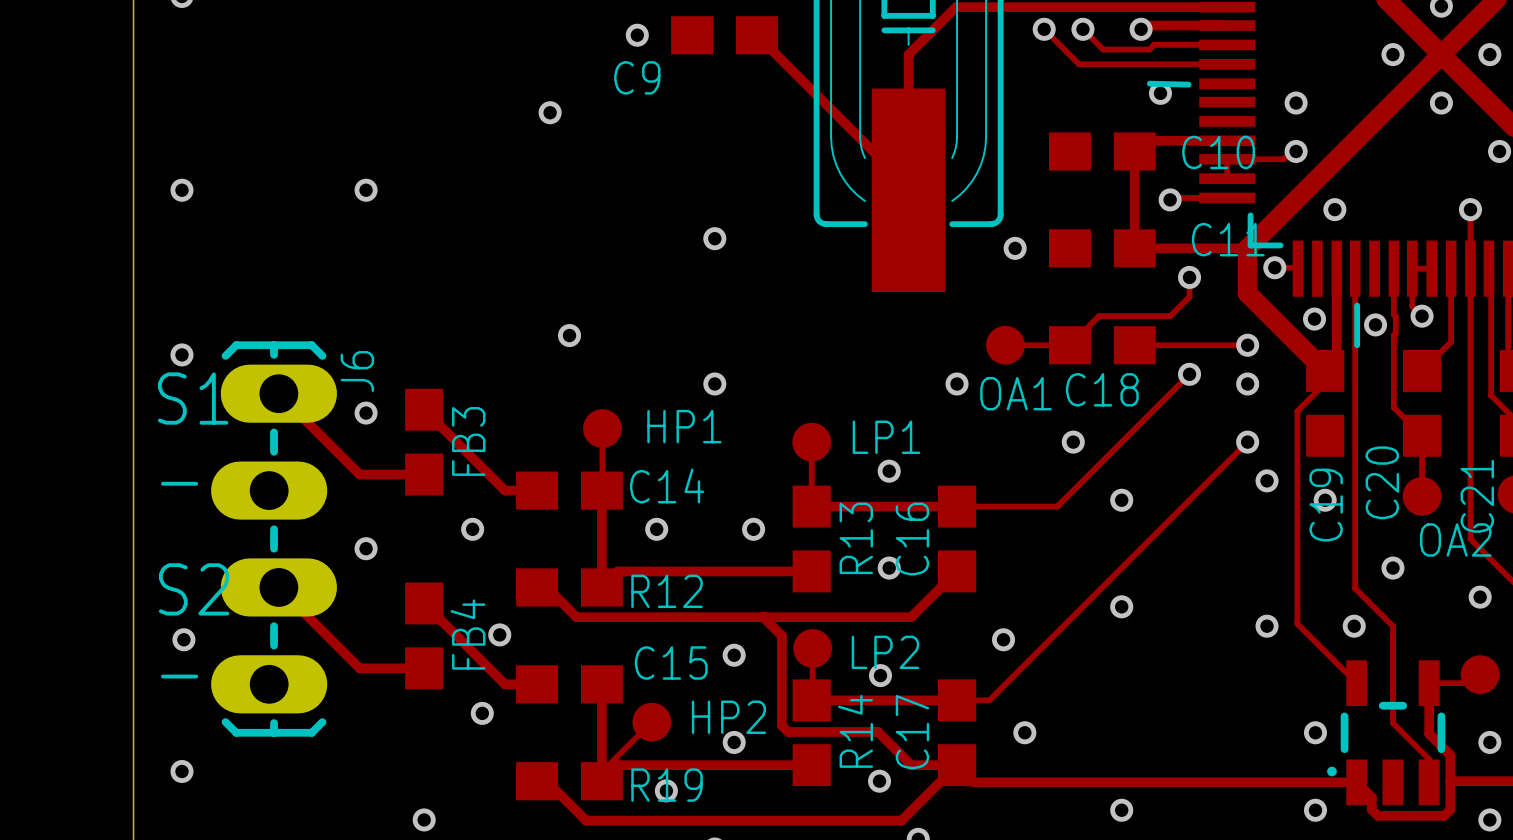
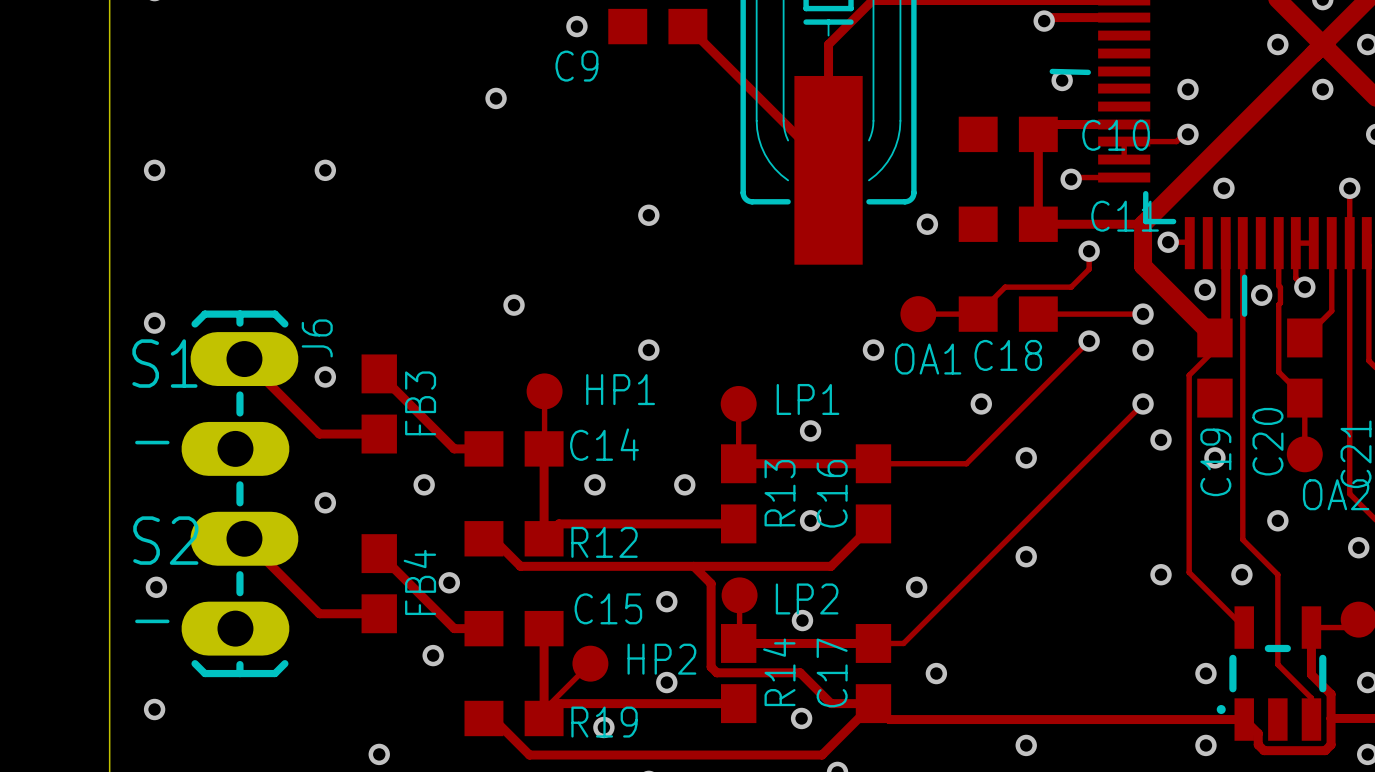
track: (1044, 29) (1079, 64) (1227, 64) -> none
via: (1044, 29) -> none
track: (1082, 29) (1103, 49) (1149, 49) (1154, 44) (1227, 44) -> none
via: (1082, 29) -> none

